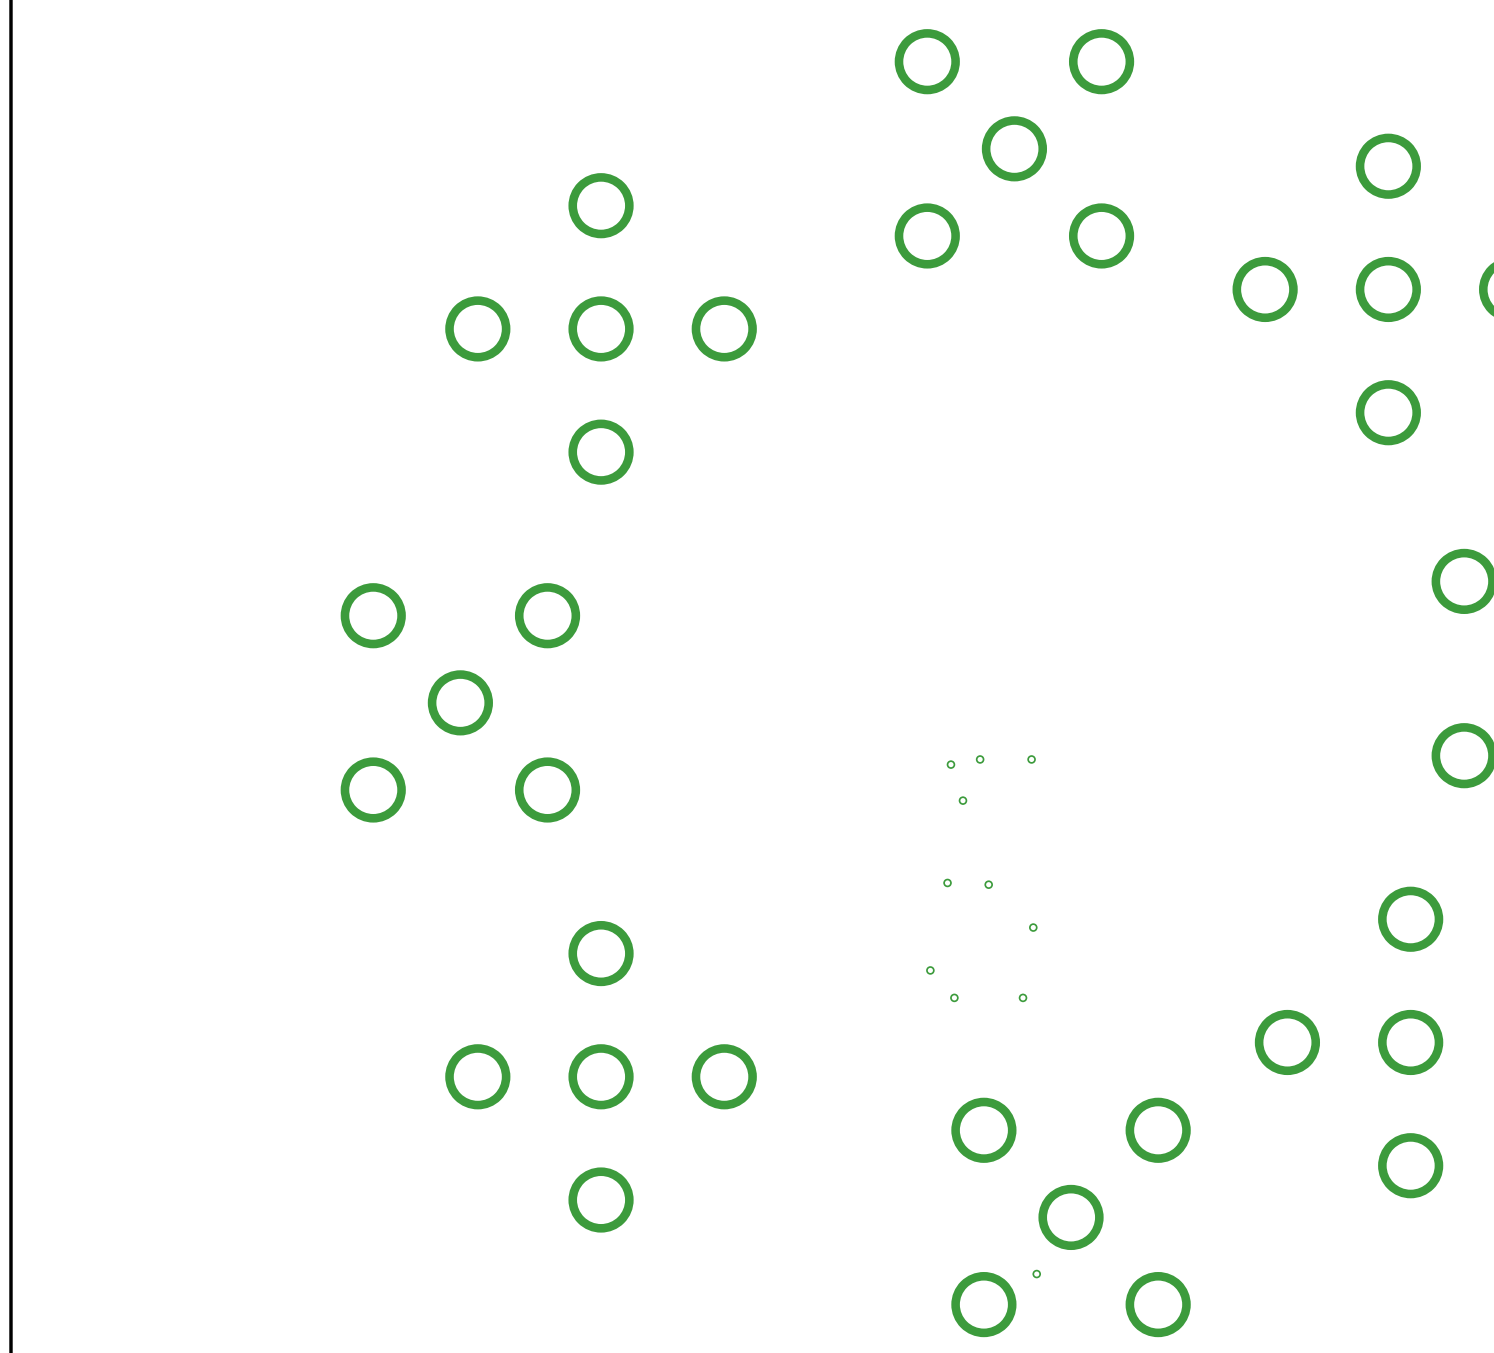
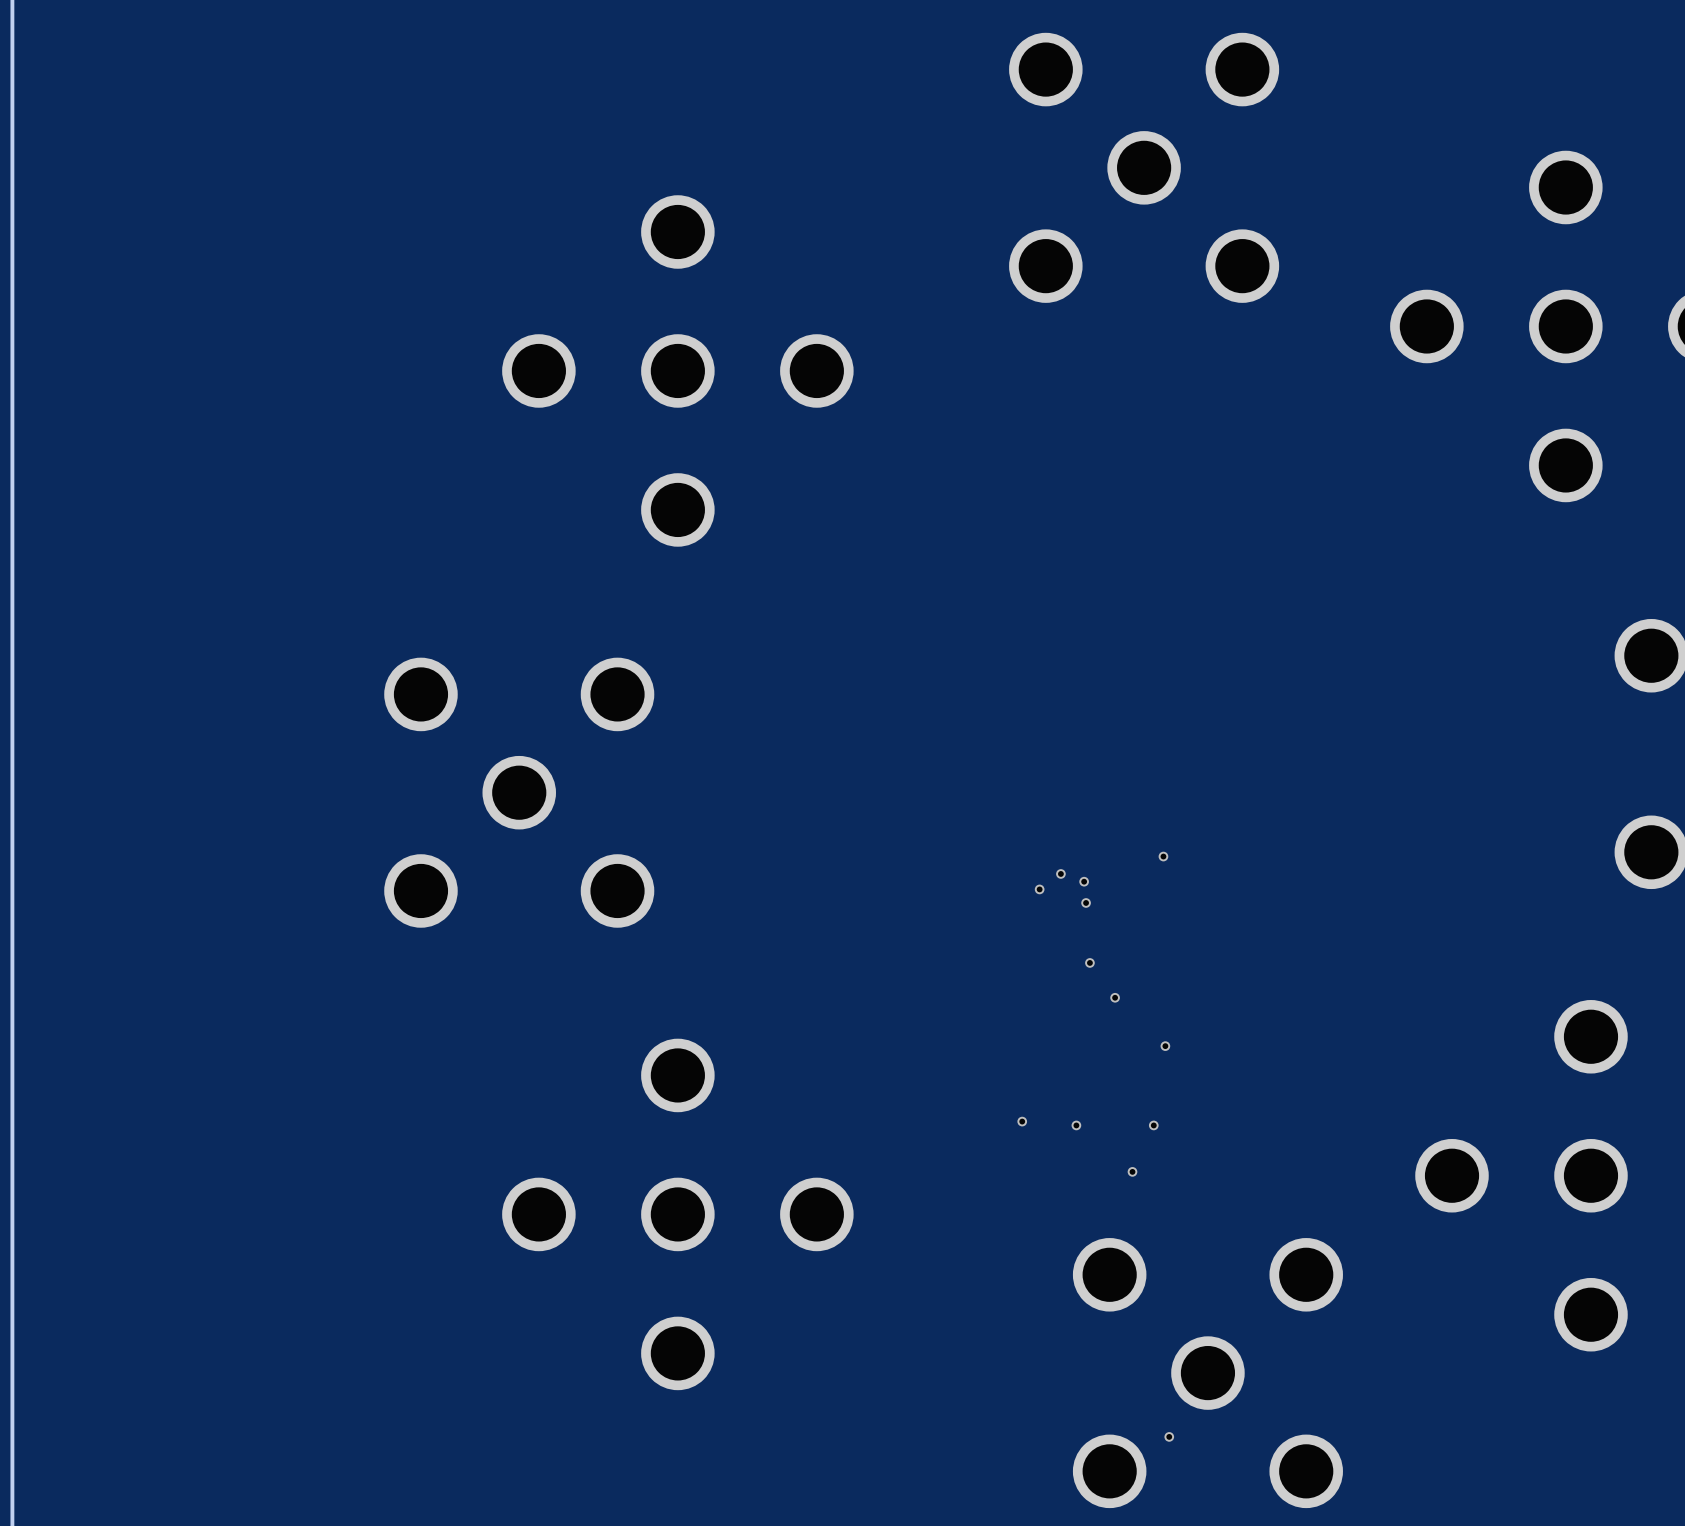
via: (980, 759) -> none
via: (950, 764) -> none
via: none -> (1060, 873)
via: none -> (1084, 881)
via: none -> (1039, 889)
via position: (947, 882) -> (1089, 962)
via position: (930, 970) -> (1022, 1121)
via: none -> (1132, 1171)

